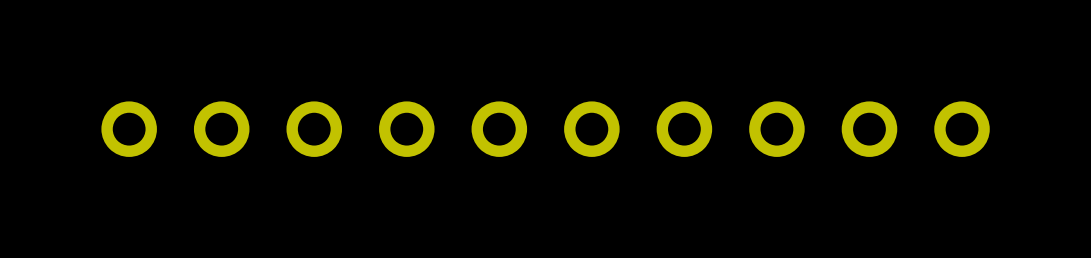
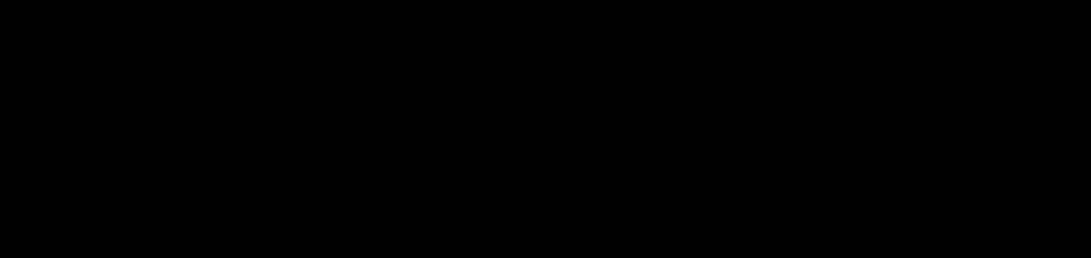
part: (545, 129) -> none

